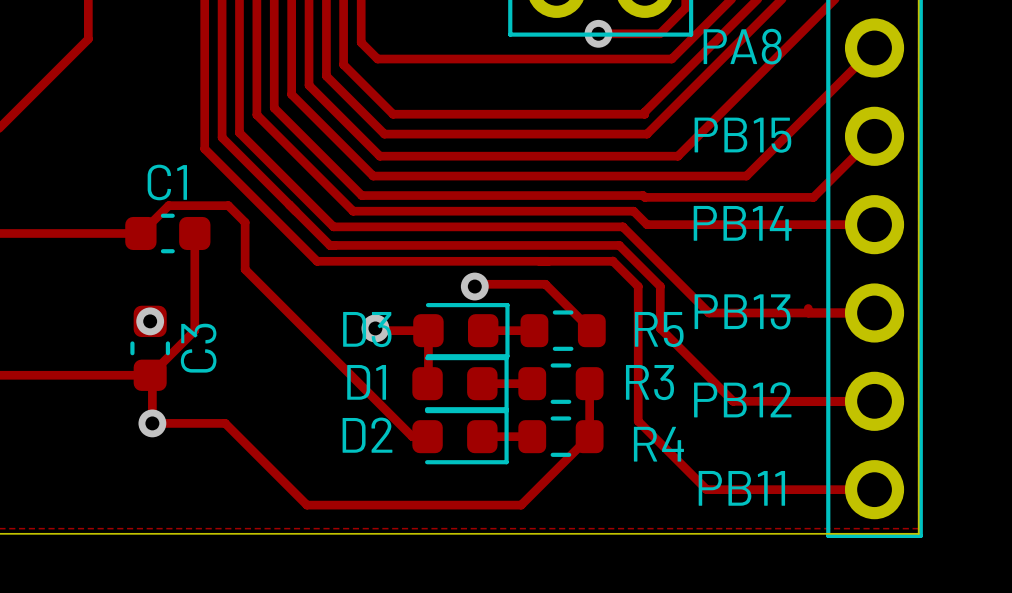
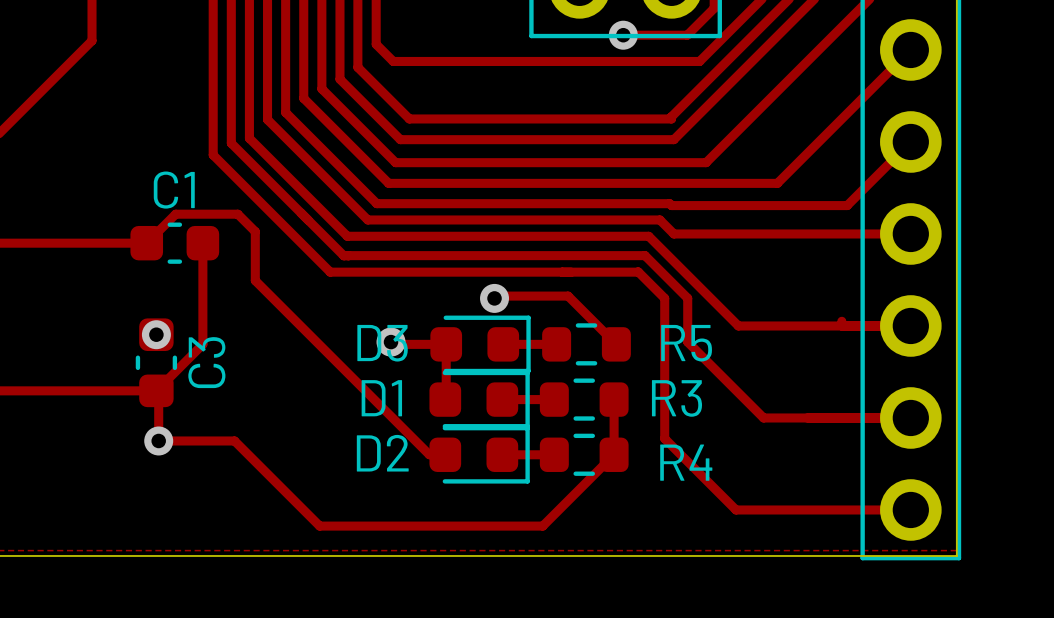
text: PA8 (742, 46) -> none
text: PB15 (742, 135) -> none
text: PB14 (742, 223) -> none
text: PB13 (742, 311) -> none
text: PB12 (742, 399) -> none
text: PB11 (741, 488) -> none

